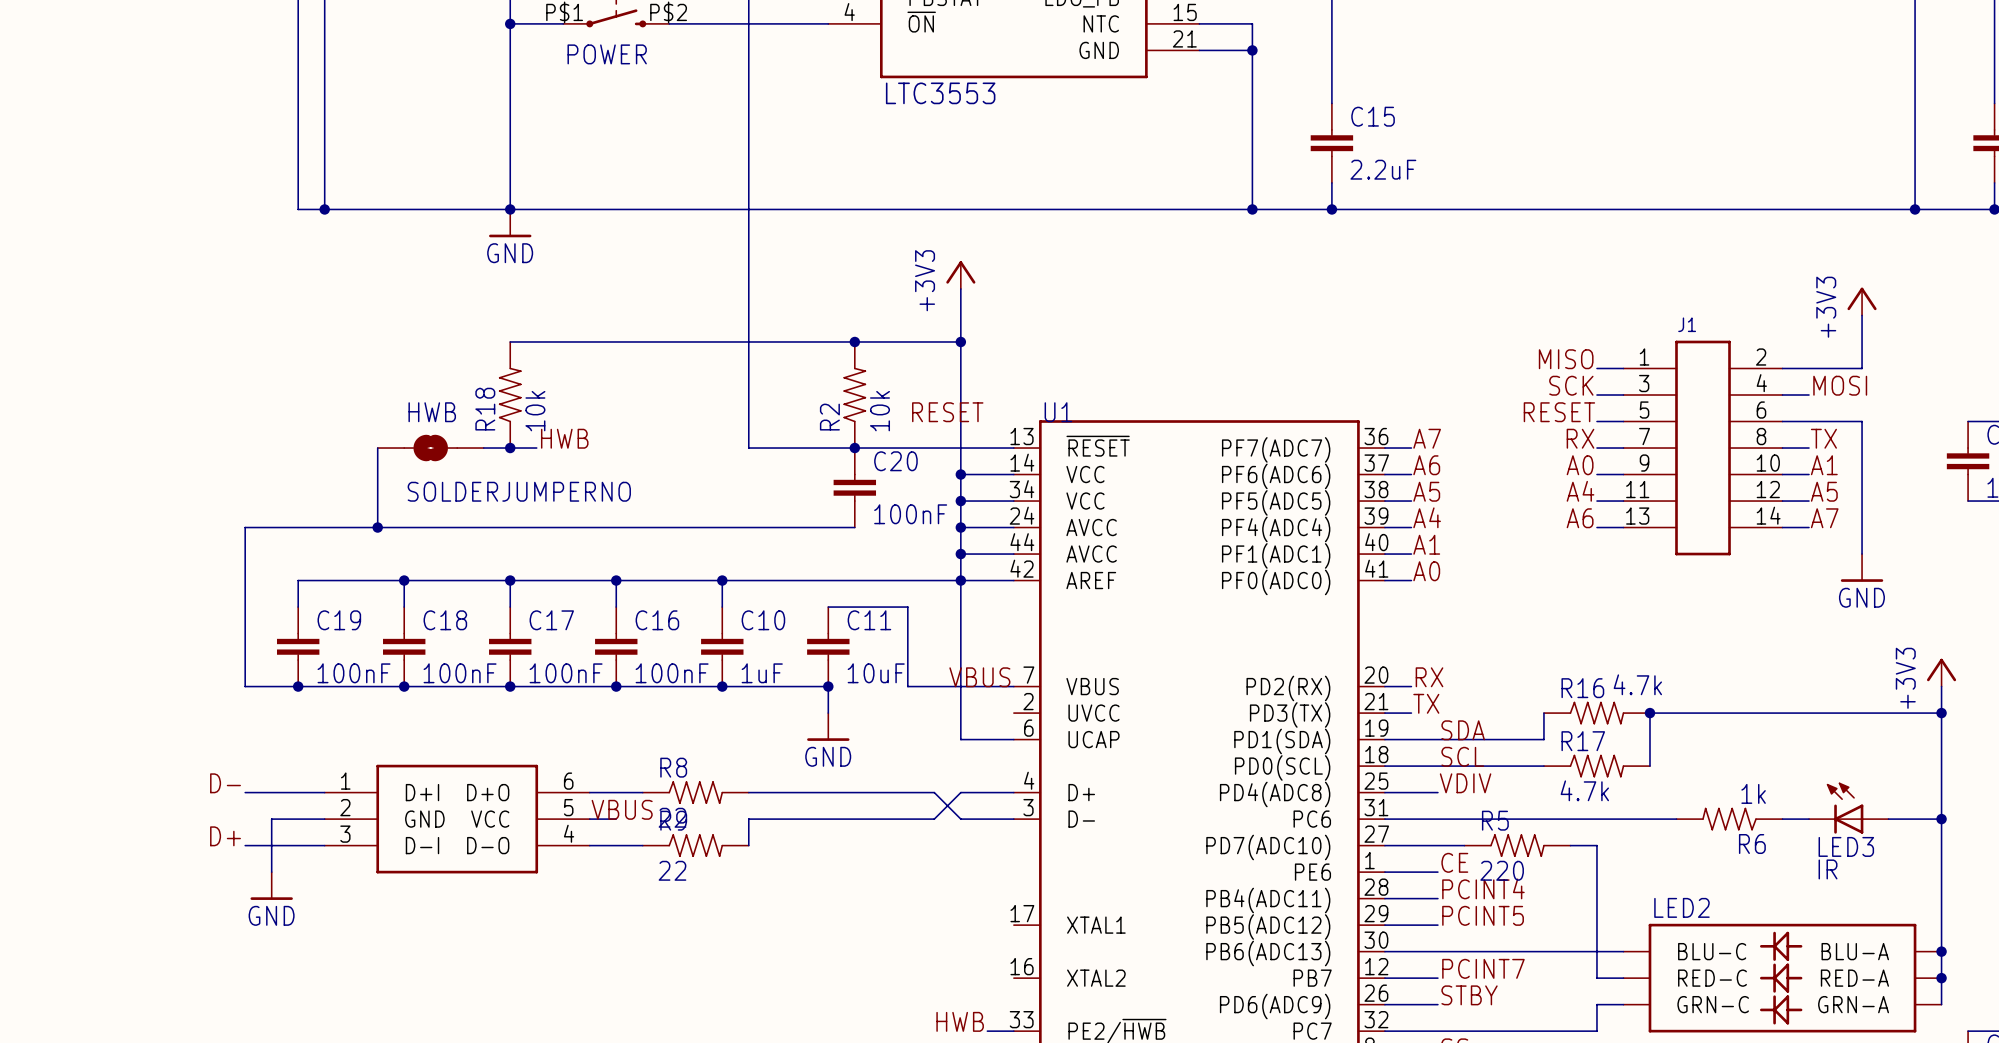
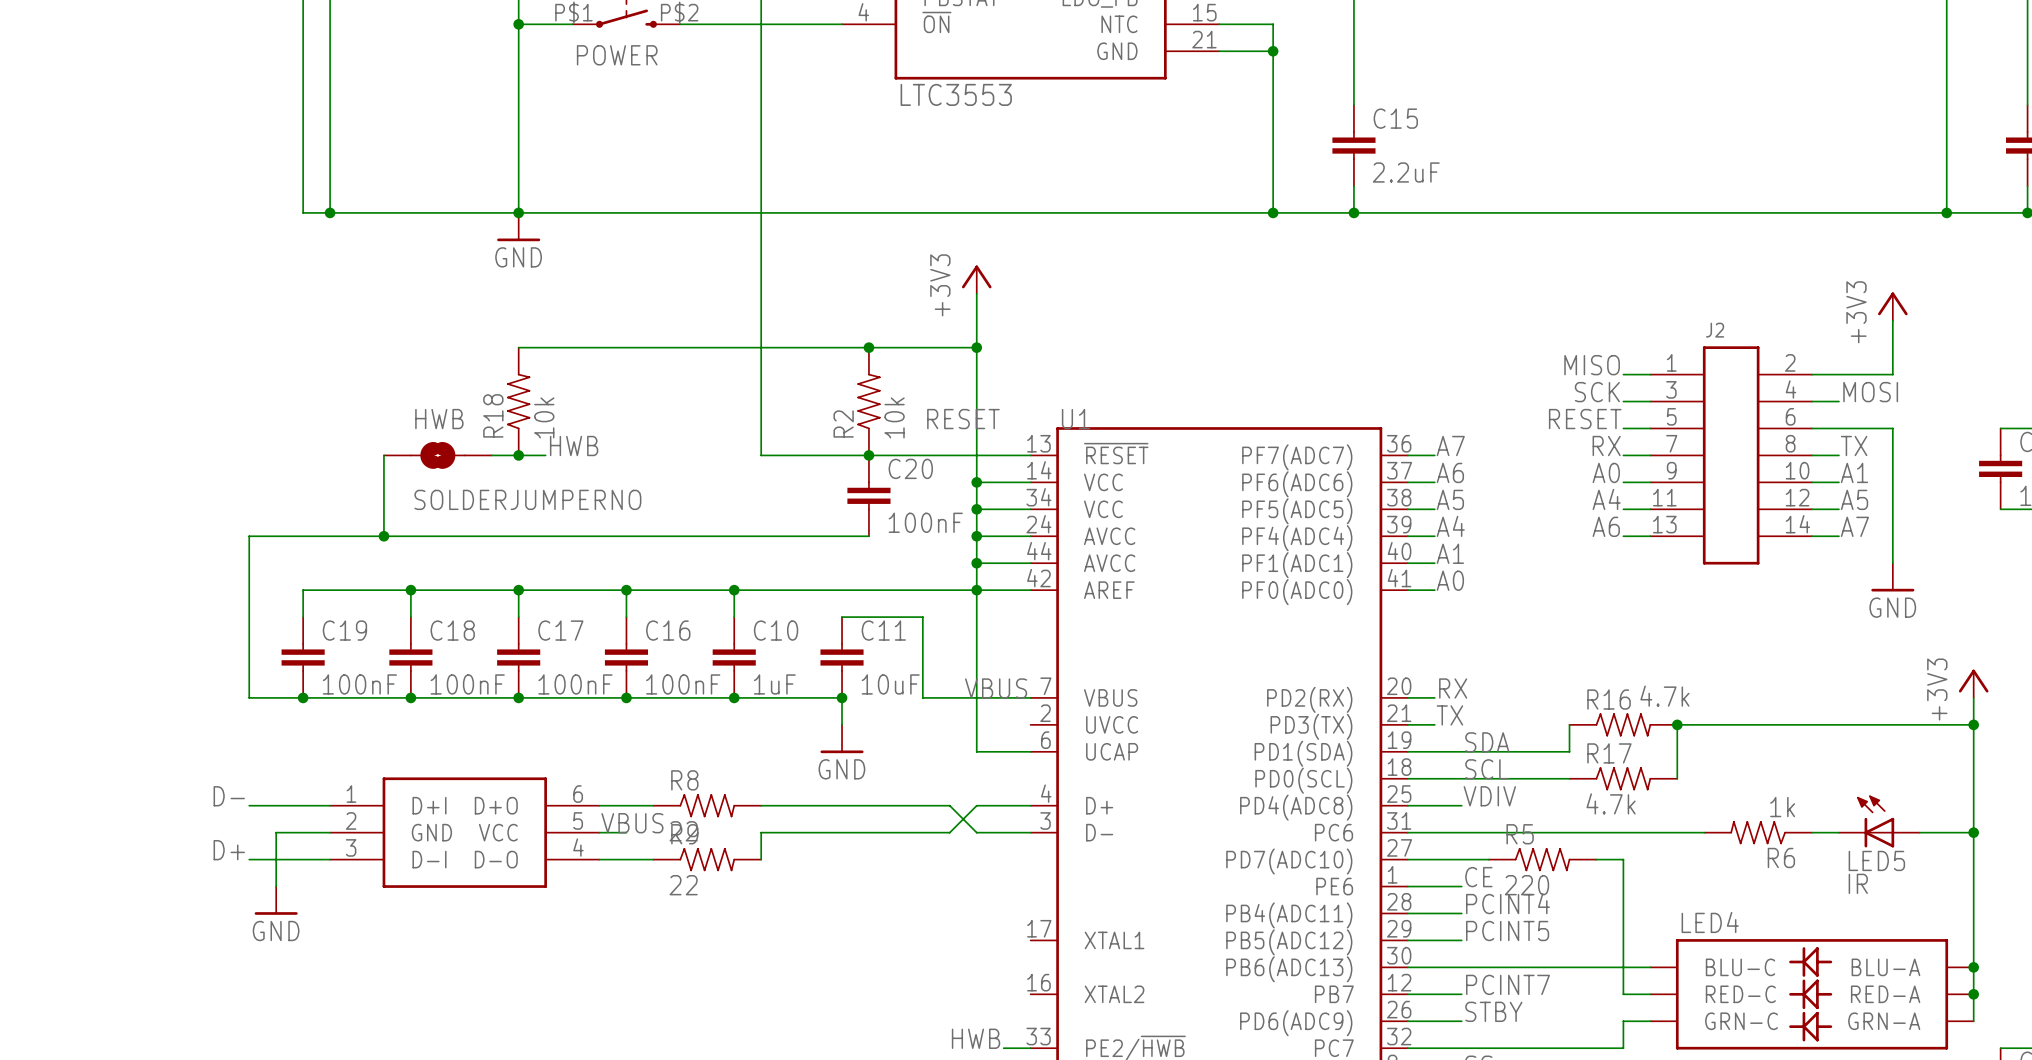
J1 name: J1 (1687, 324) -> J2 (1715, 330)
LED3 name: LED3 (1846, 846) -> LED5 (1876, 860)
LED2 name: LED2 (1681, 907) -> LED4 (1710, 922)

